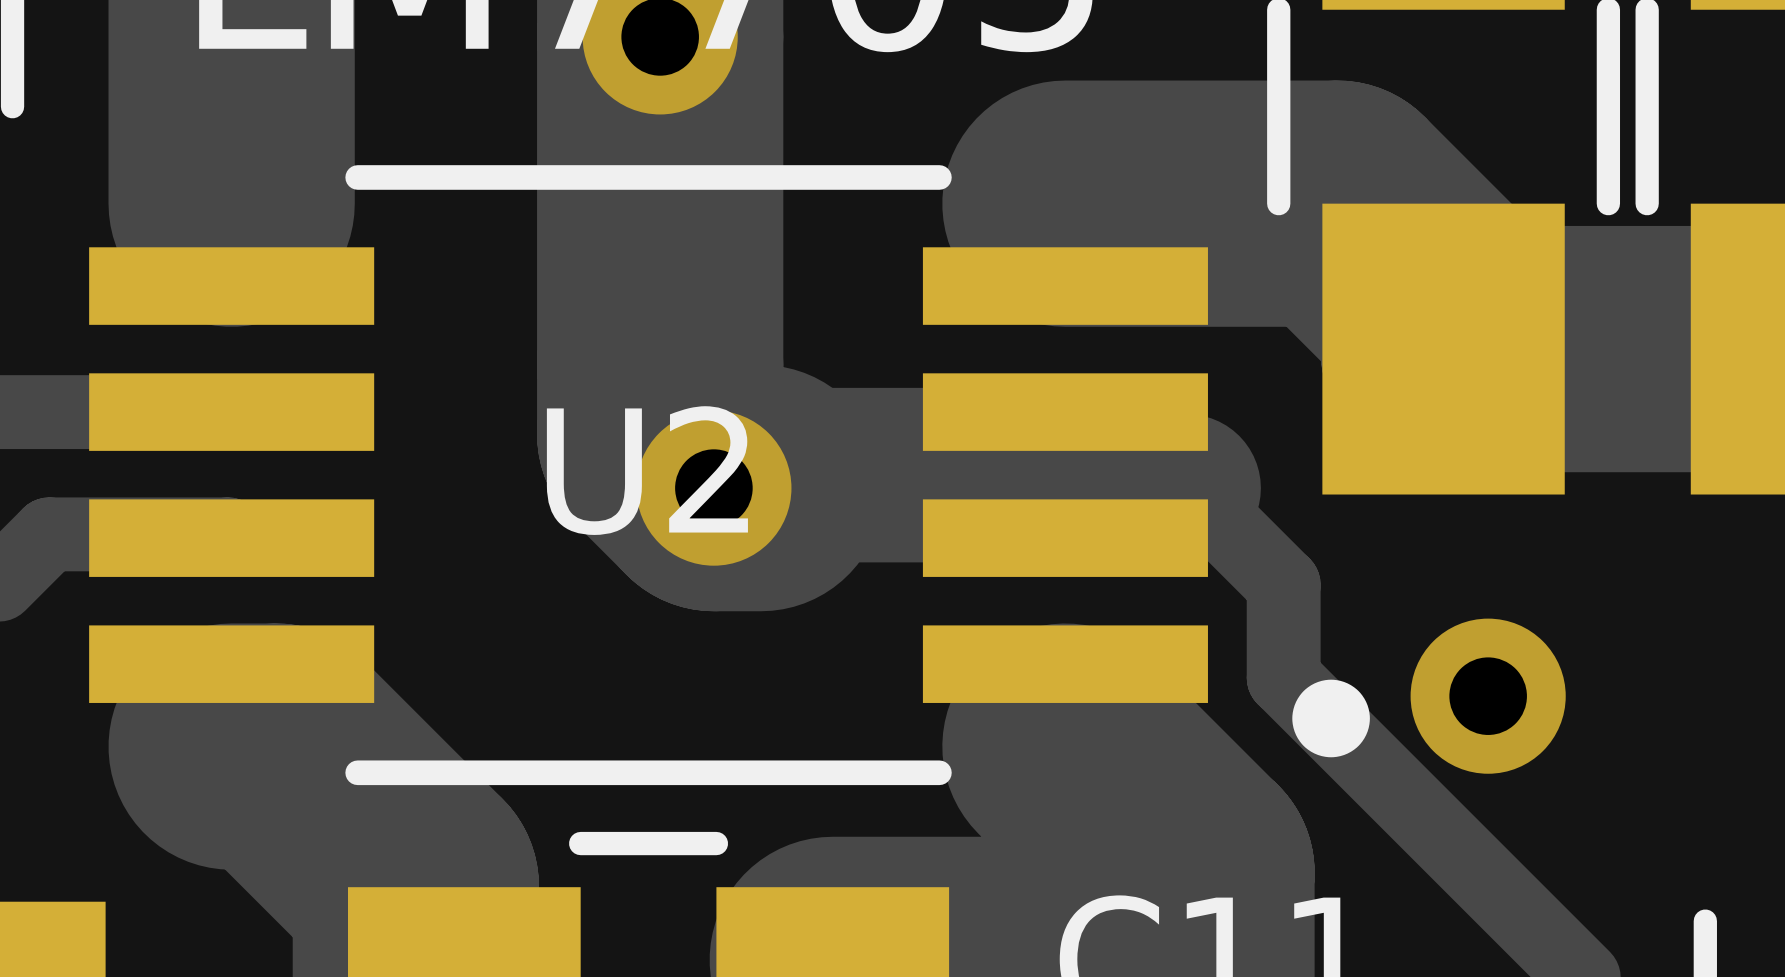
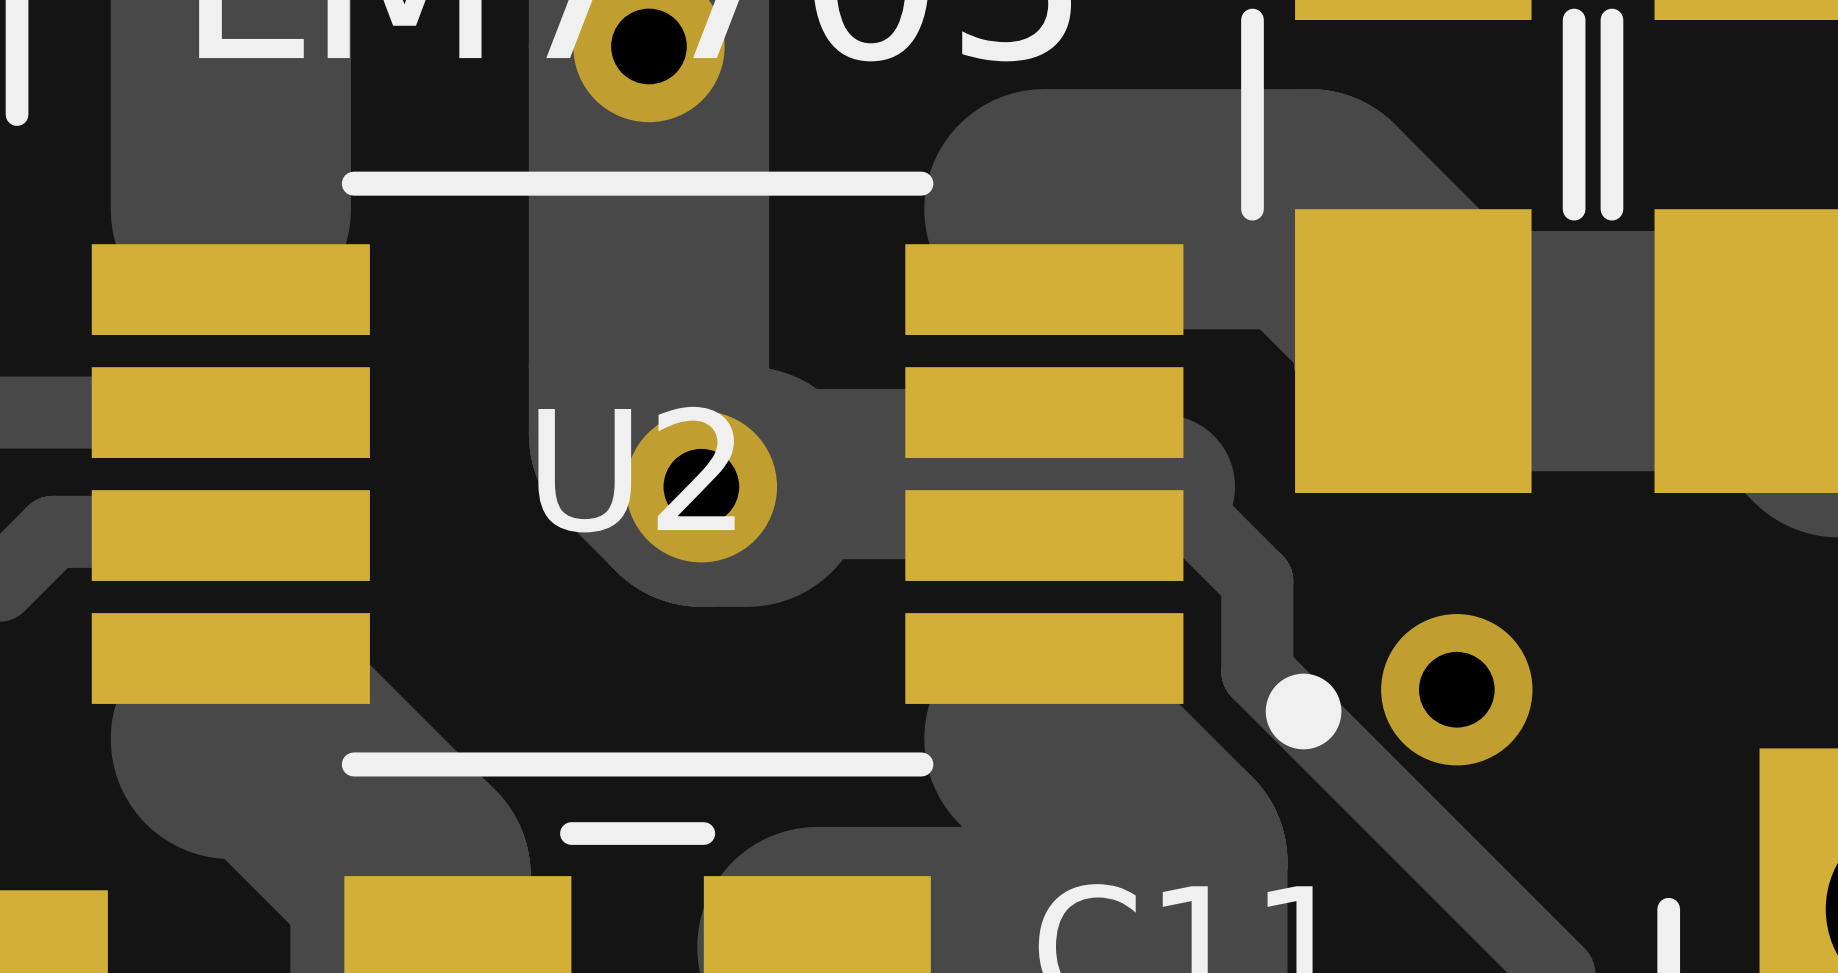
U2 footprint: [89, 165, 1370, 786] -> [91, 171, 1342, 777]

